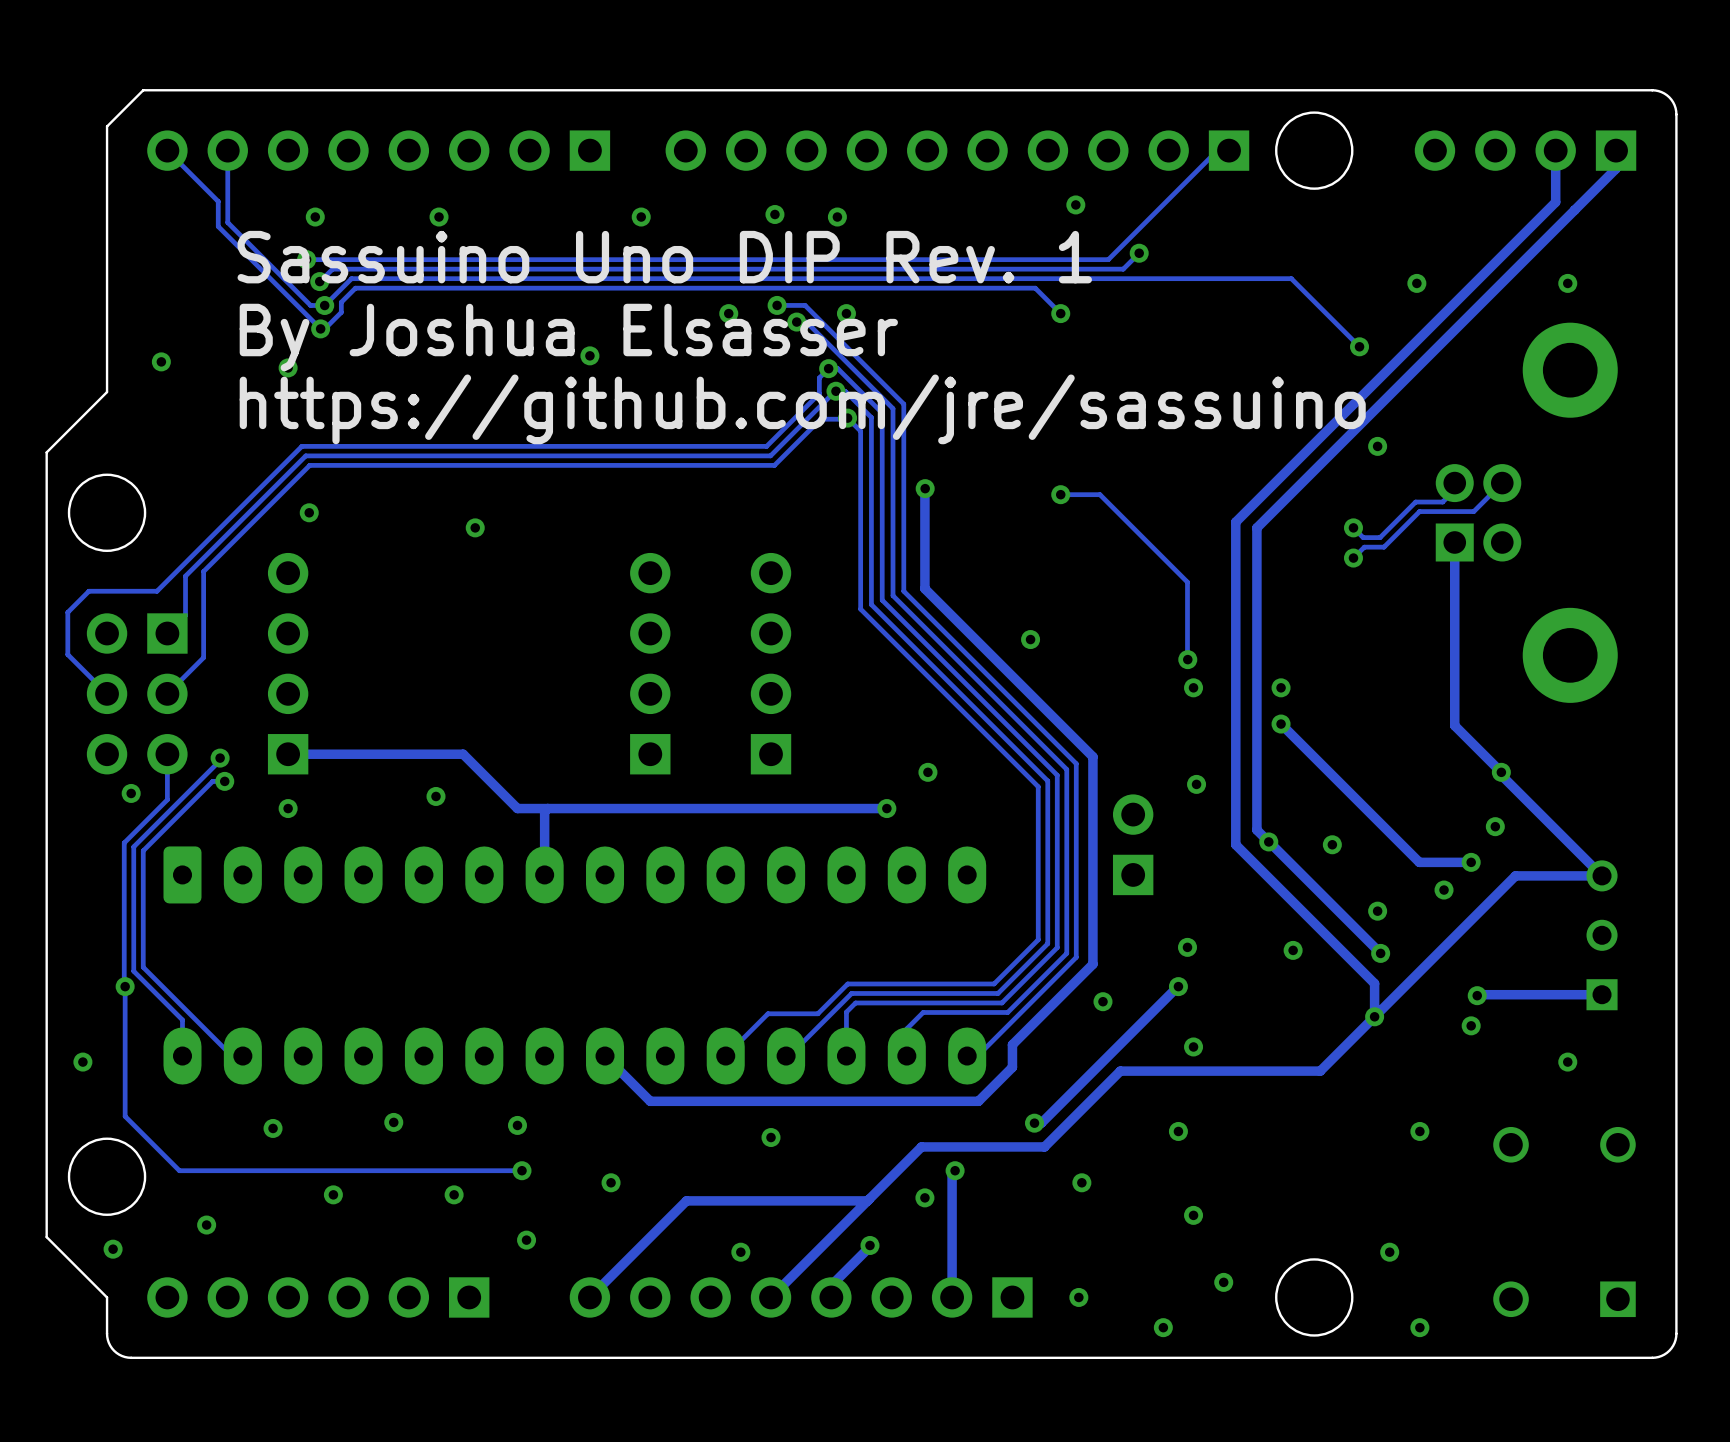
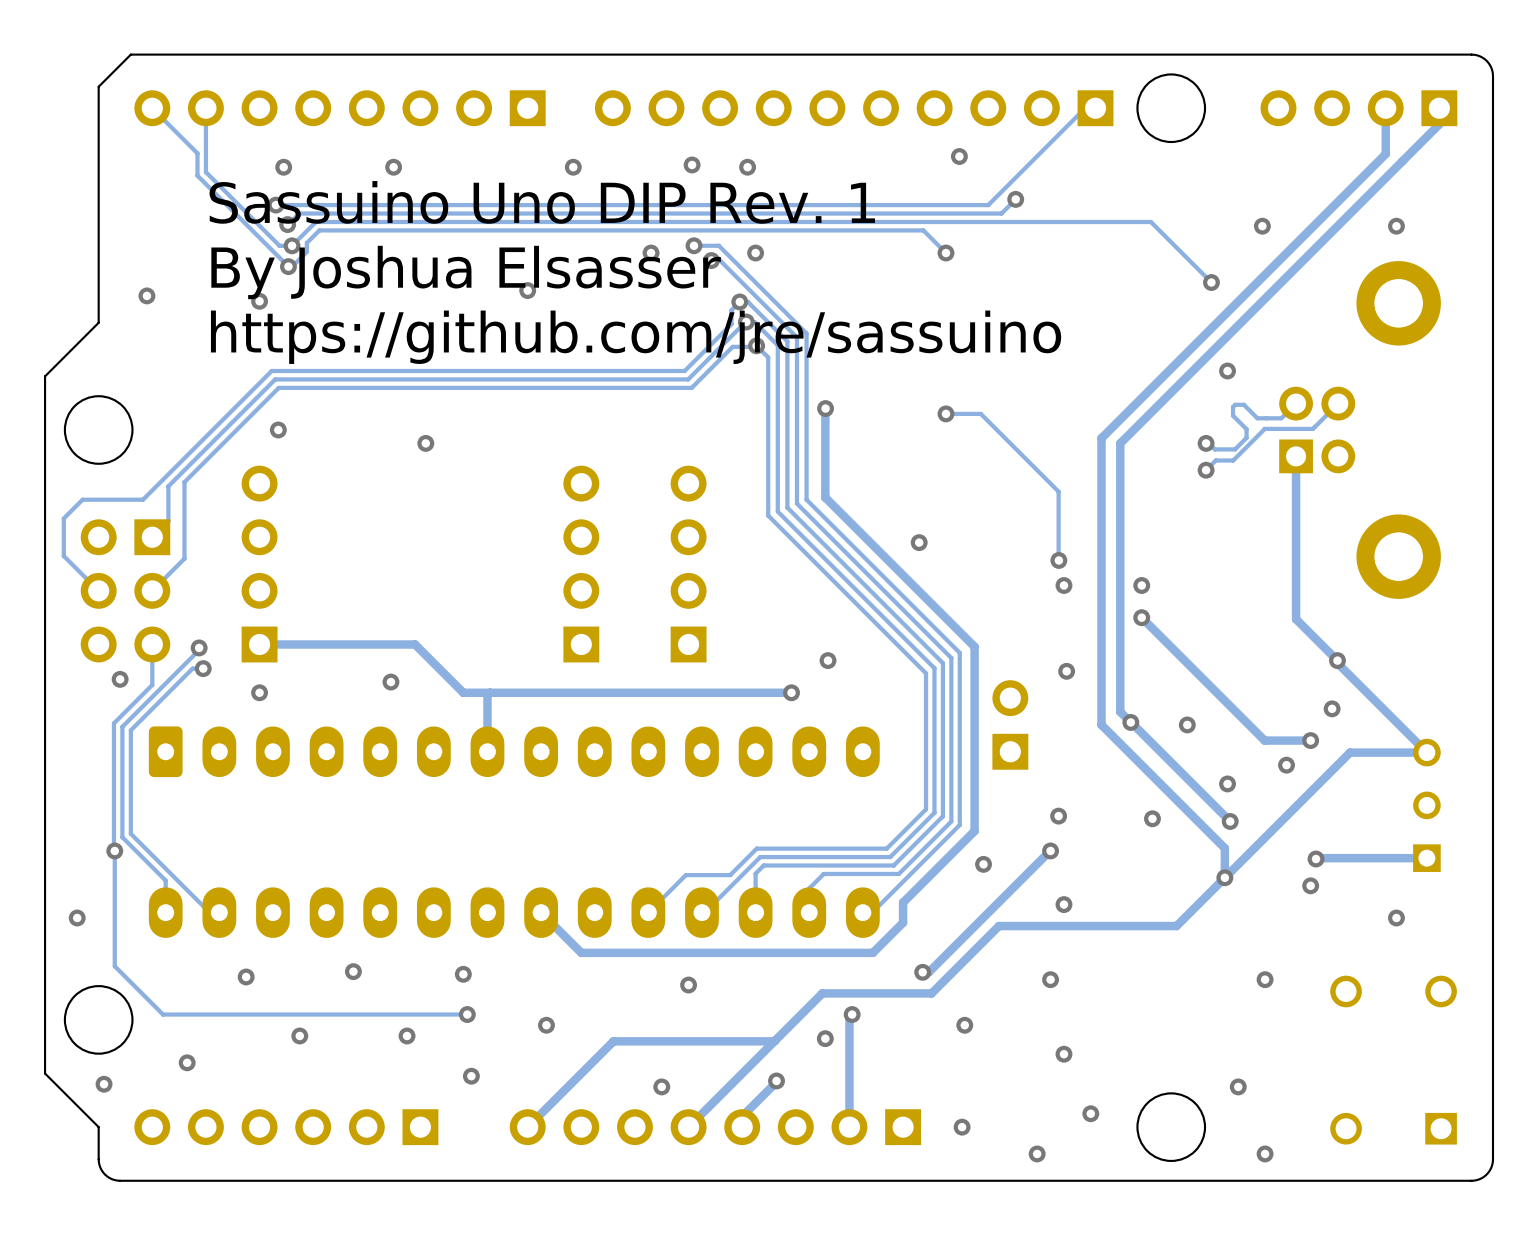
track: (1450, 494) (1442, 502) (1415, 502) (1380, 537) (1363, 537) (1353, 527) -> (1296, 403) (1281, 418) (1257, 418) (1243, 404) (1235, 404) (1233, 406) (1233, 415) (1246, 429) (1246, 437) (1235, 449) (1214, 449) (1208, 443) (1206, 443)

